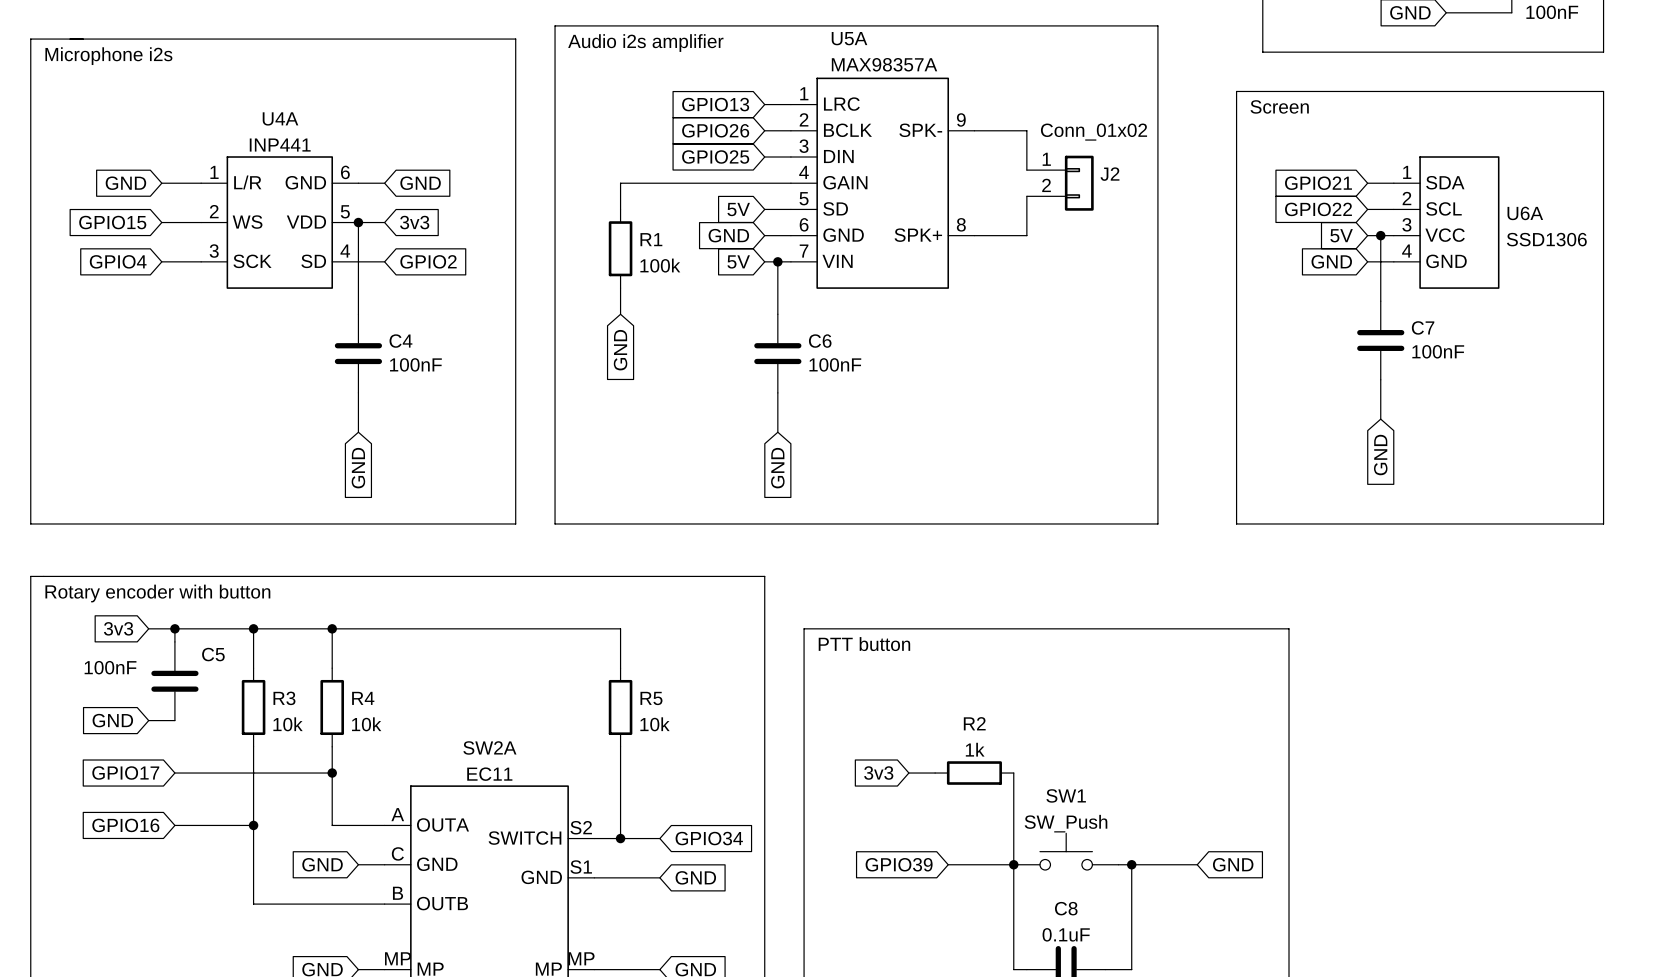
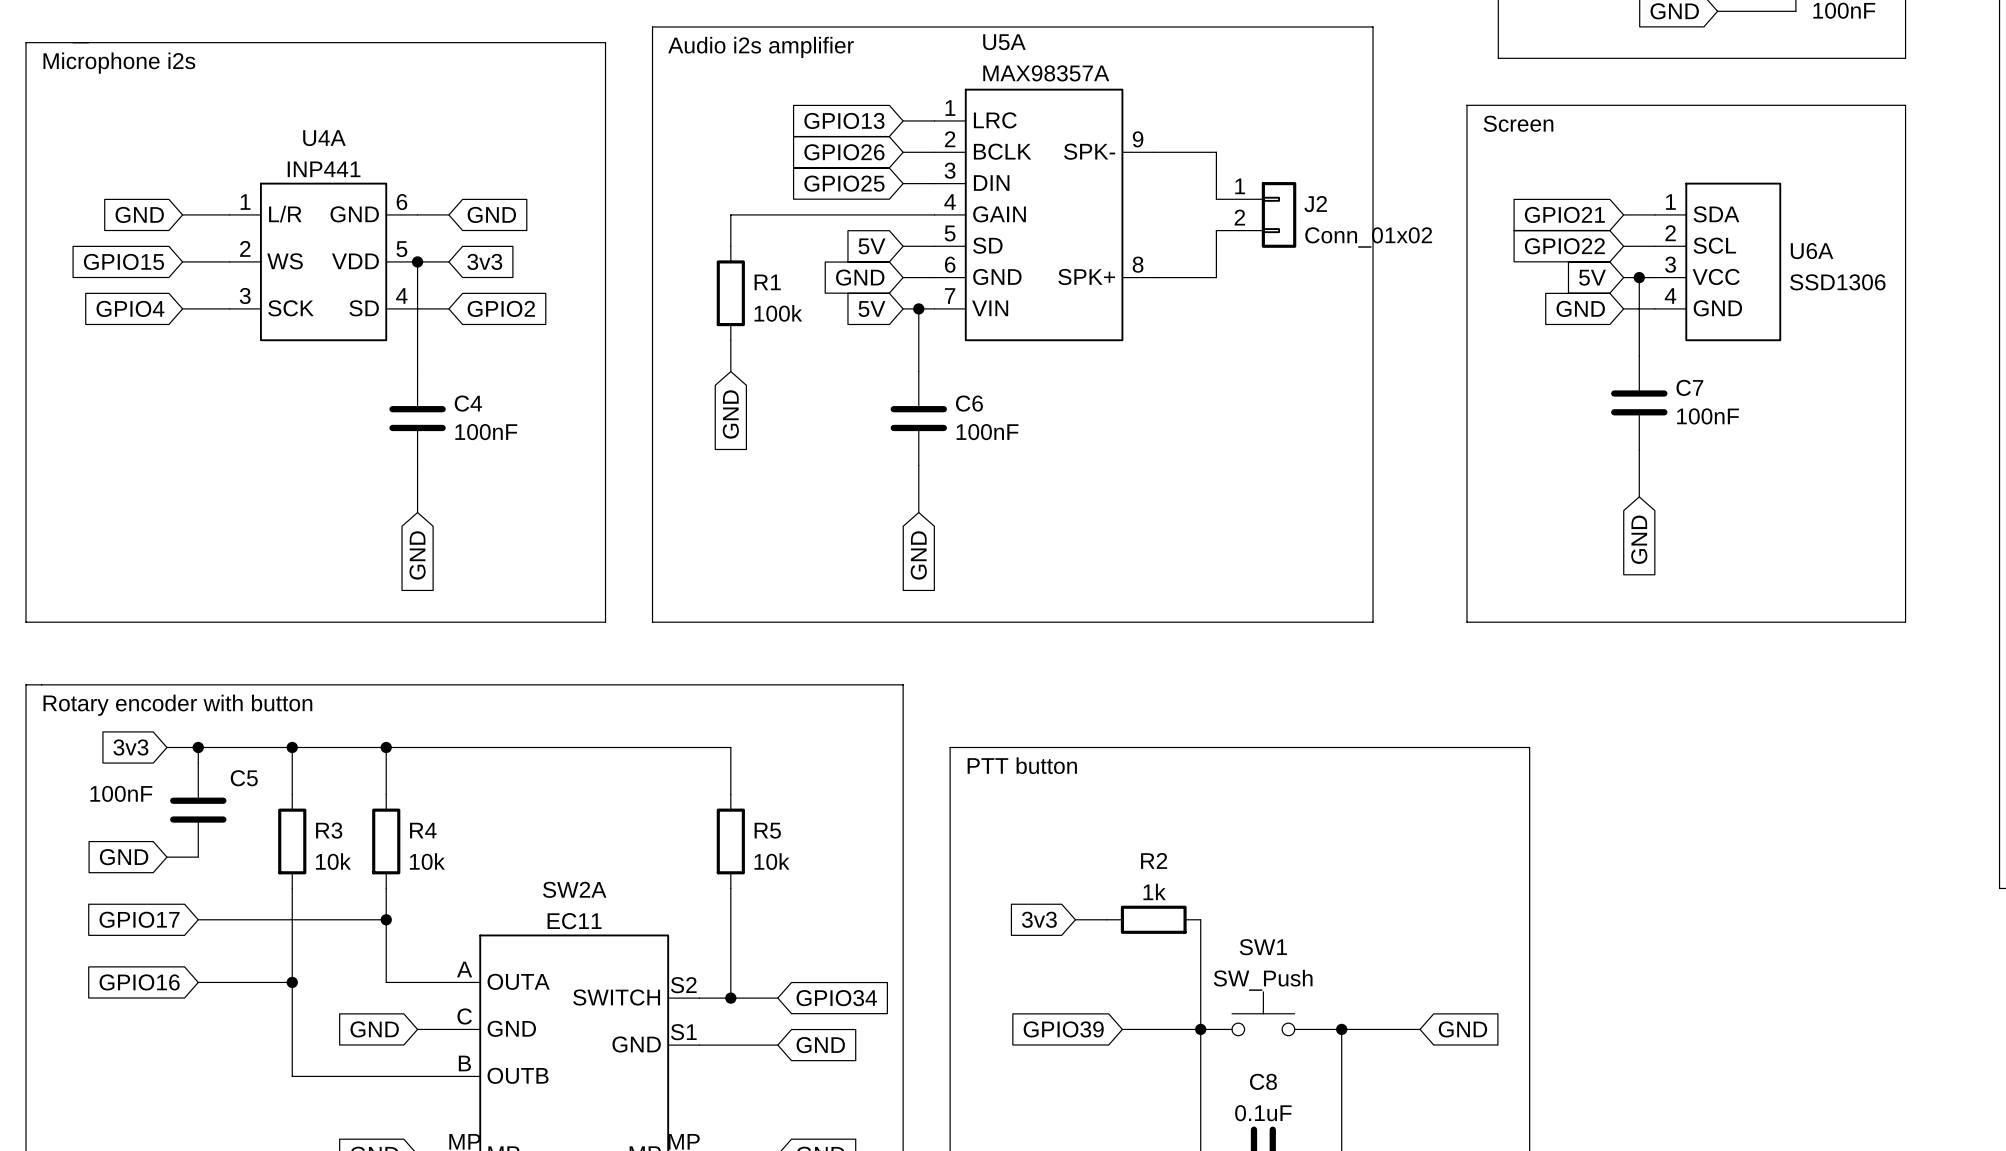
J2 value position: Conn_01x02 (1094, 132) -> Conn_01x02 (1368, 237)

